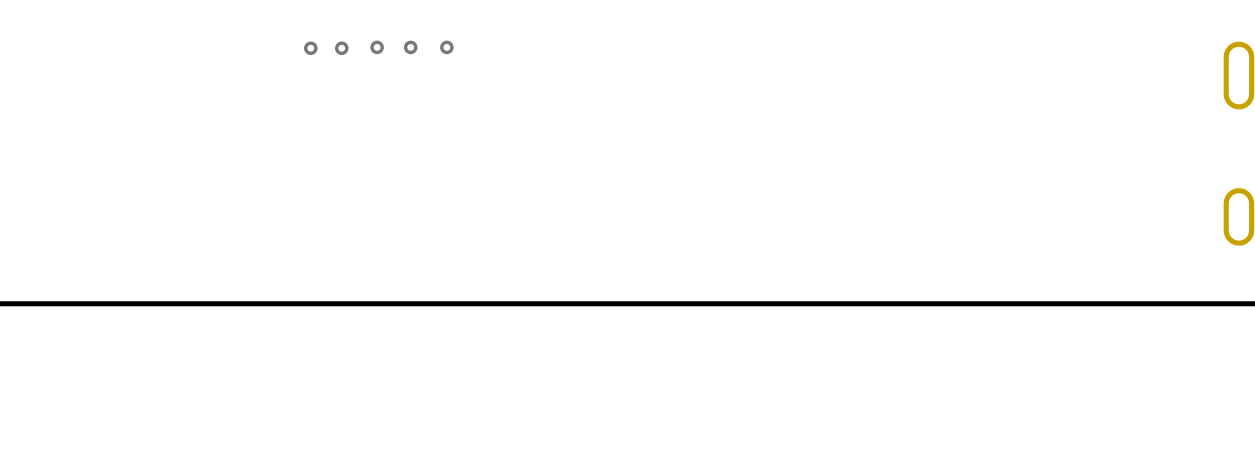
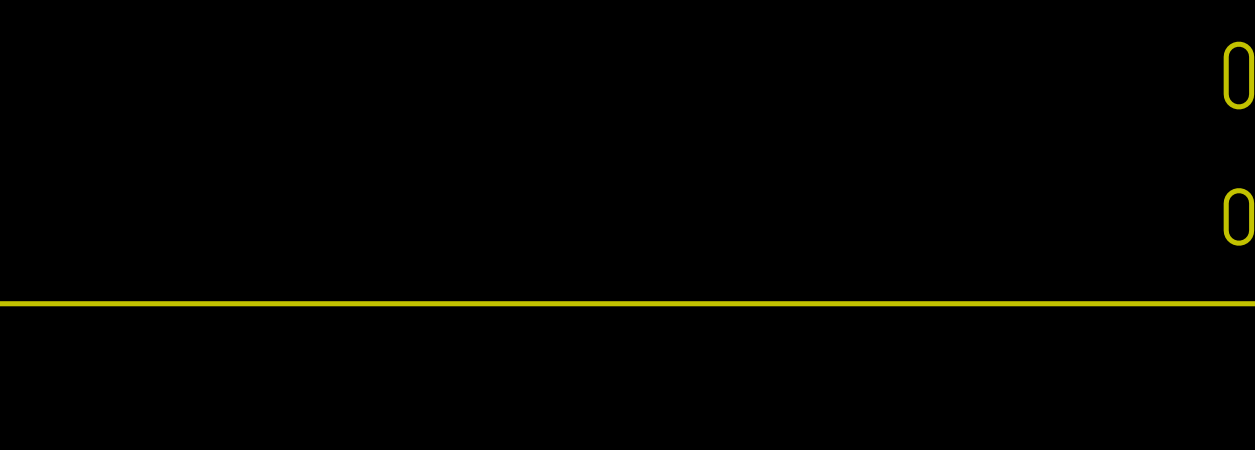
via: (377, 47) -> none
via: (410, 47) -> none
via: (446, 47) -> none
via: (310, 48) -> none
via: (341, 48) -> none

